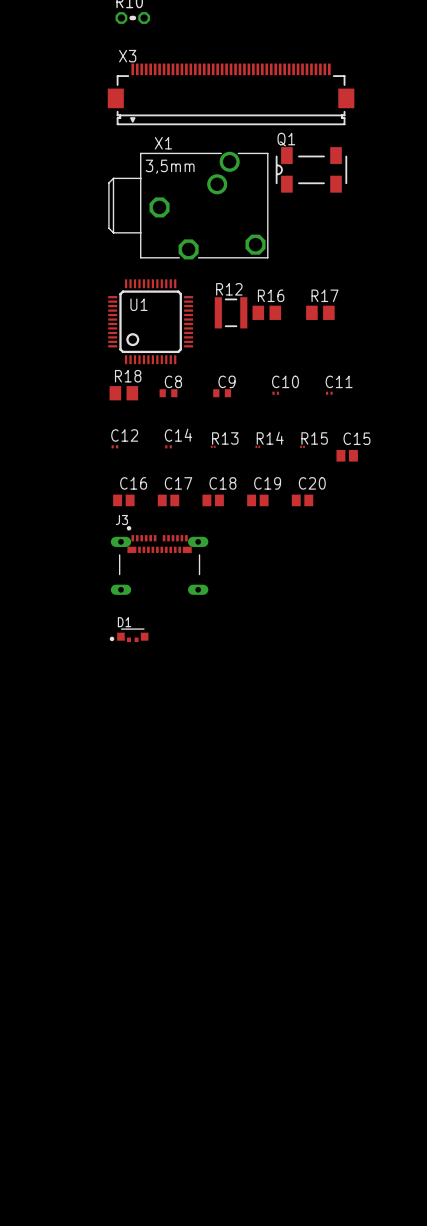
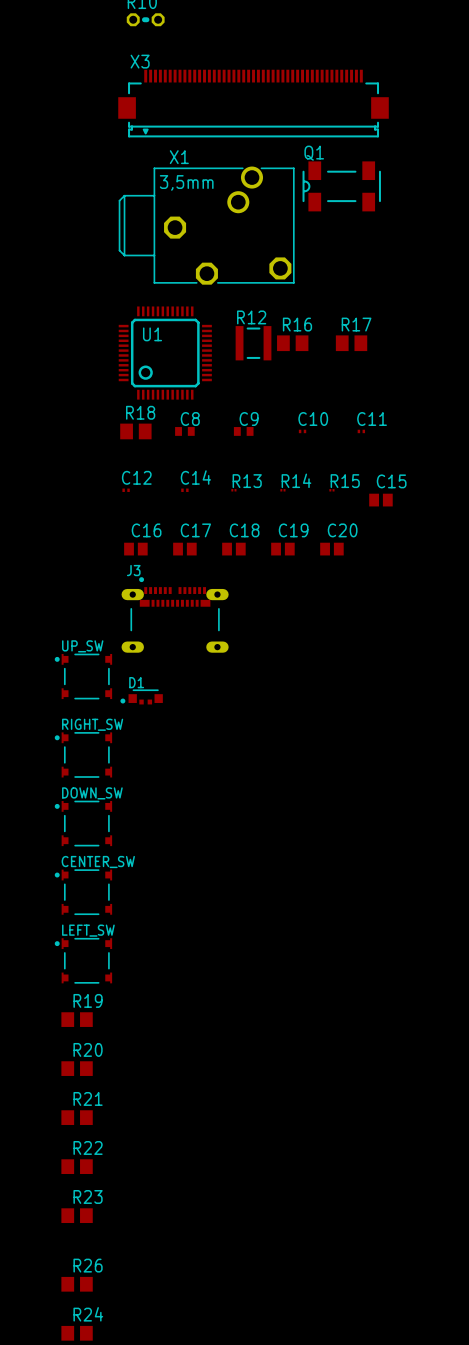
UP_SW: none -> (83, 676)
RIGHT_SW: none -> (83, 754)
DOWN_SW: none -> (83, 823)
CENTER_SW: none -> (83, 892)
LEFT_SW: none -> (83, 960)
R19: none -> (77, 1019)
R20: none -> (77, 1068)
R21: none -> (77, 1117)
R22: none -> (77, 1166)
R23: none -> (77, 1215)
R26: none -> (77, 1284)
R24: none -> (77, 1333)

